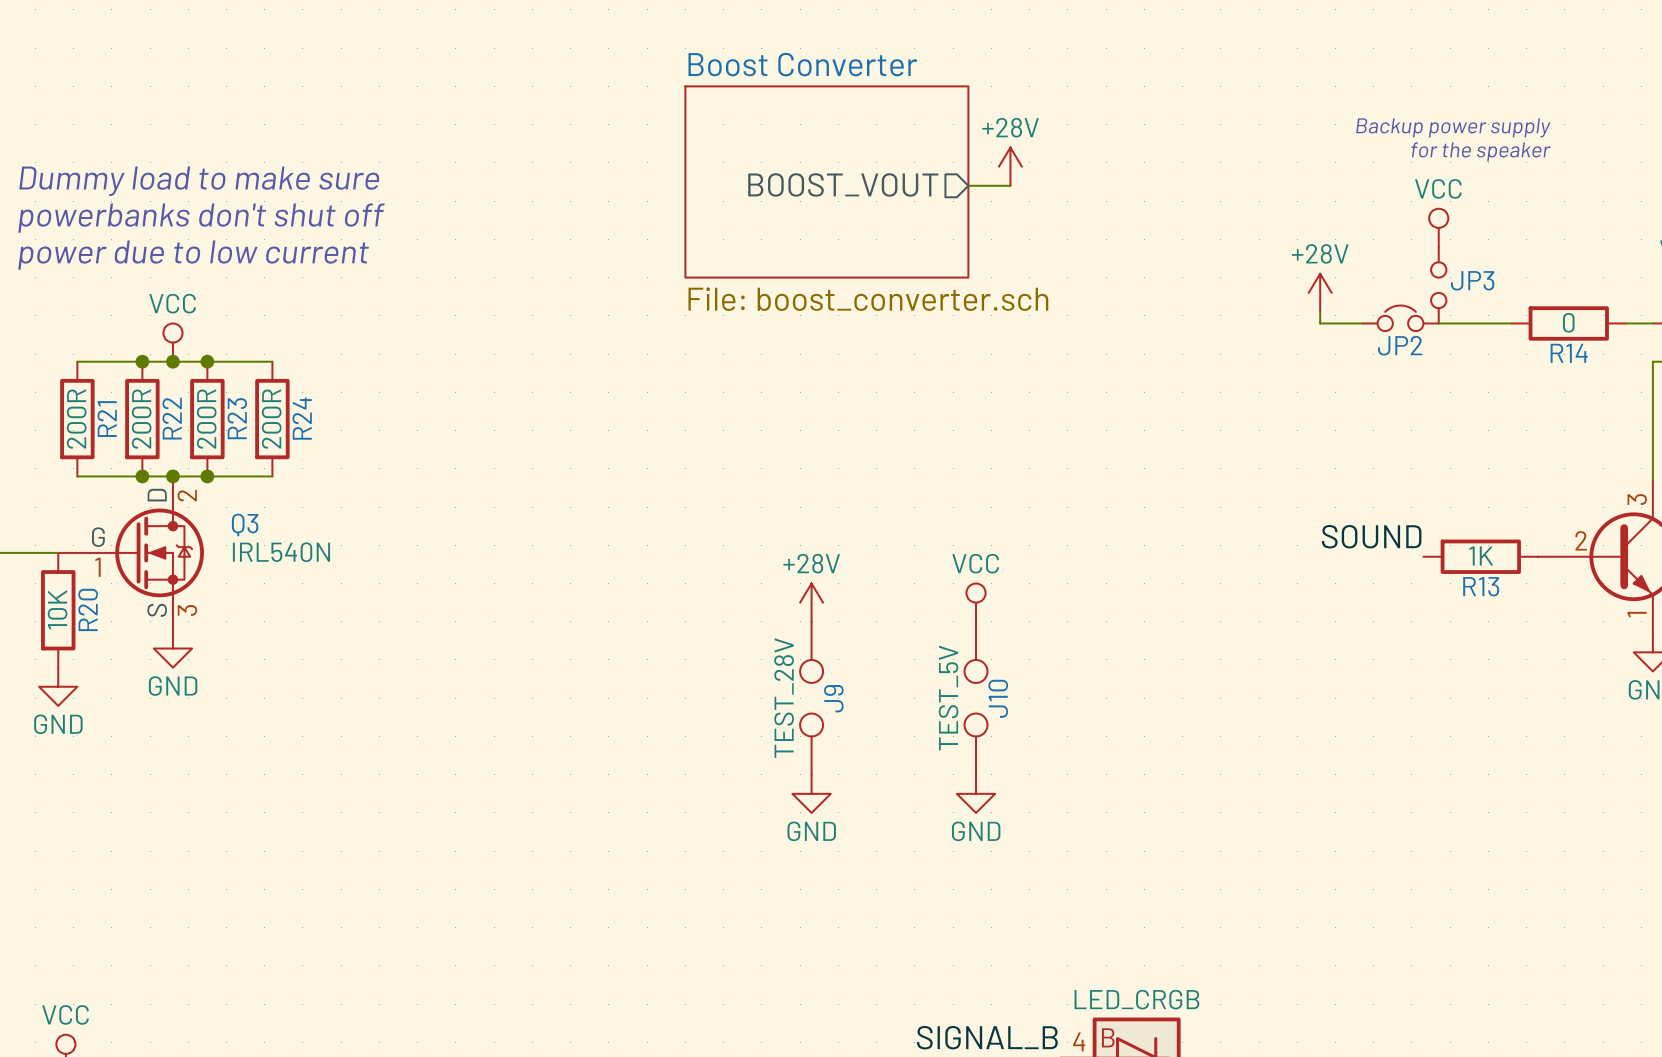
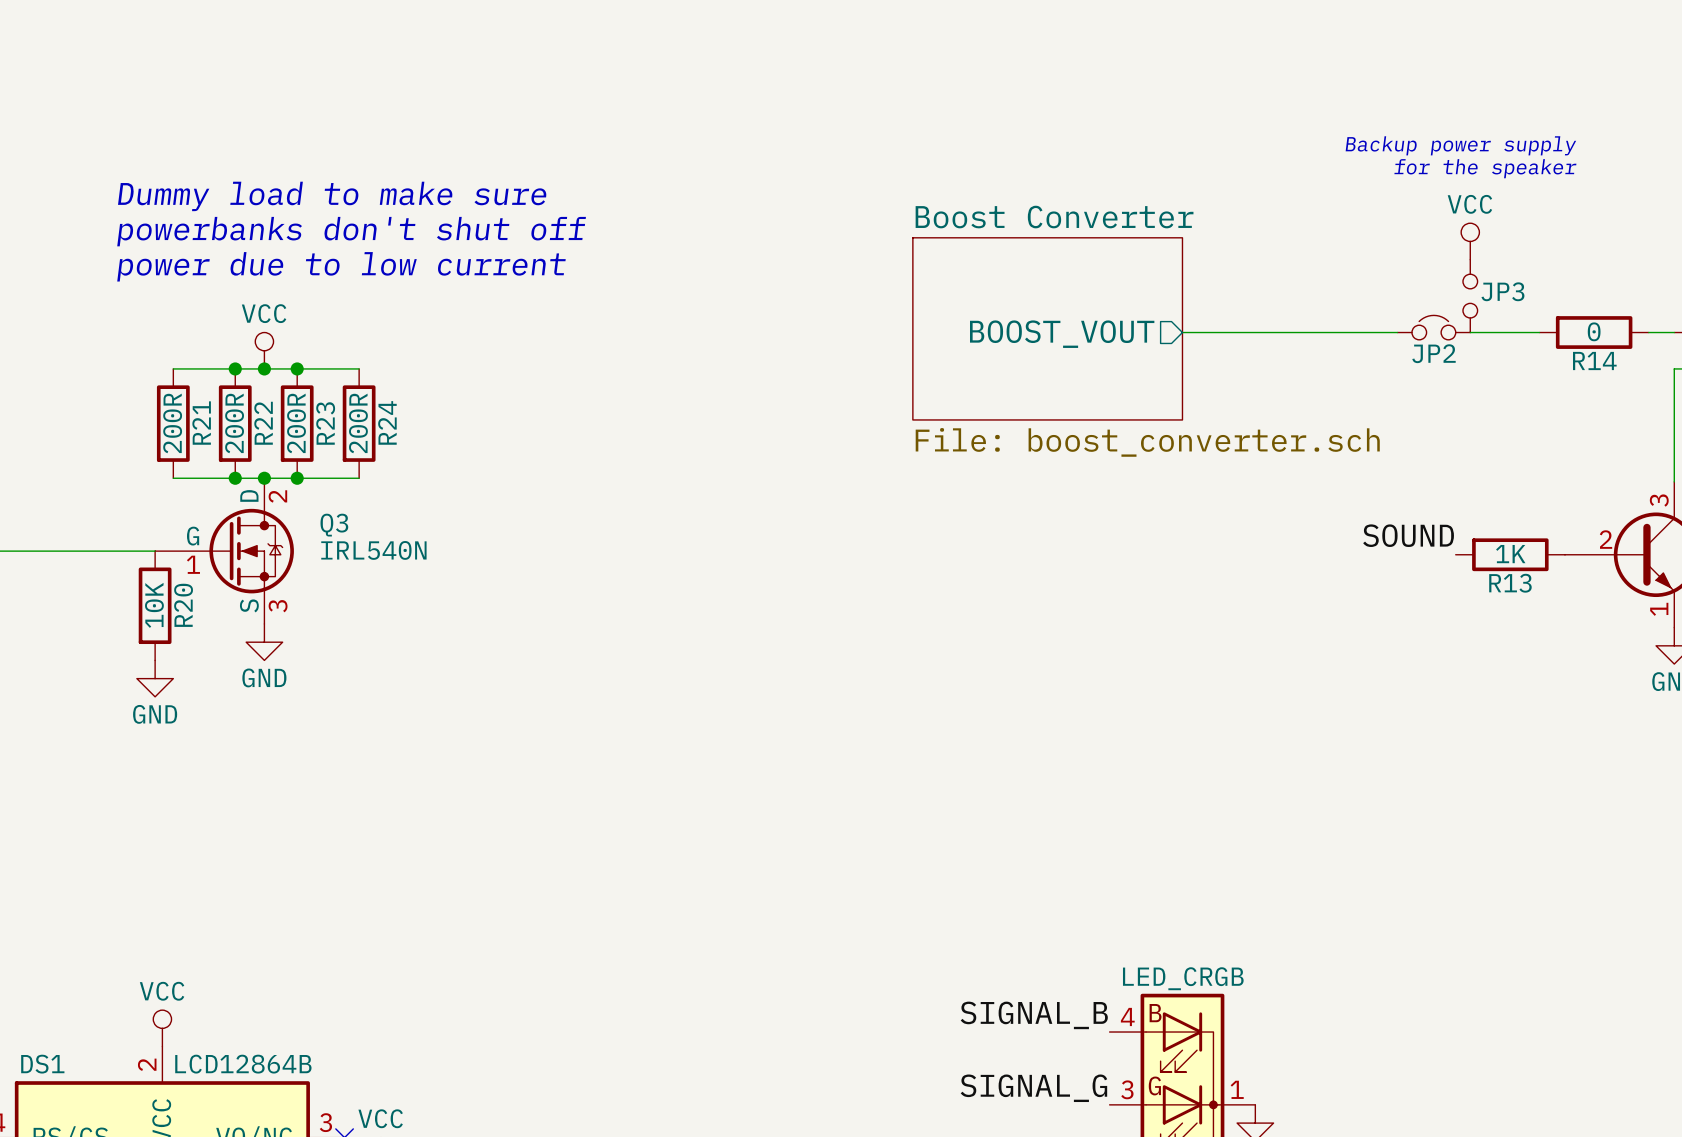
power symbol: +28V (1010, 166) -> none
sheet Boost Converter position: (826, 181) -> (1047, 328)
sheet pin position: BOOST_VOUT (843, 184) -> BOOST_VOUT (1062, 334)
wire: (968, 185) (1010, 185) -> none
power symbol: +28V (1320, 292) -> none
wire: (1320, 312) (1320, 323) -> (1182, 332) (1357, 332)
power symbol: +28V (811, 602) -> none
power symbol: VCC (976, 602) -> none
J9: TEST_28V (811, 698) -> none
J10: TEST_5V (976, 698) -> none
power symbol: GND (811, 793) -> none
power symbol: GND (976, 793) -> none

